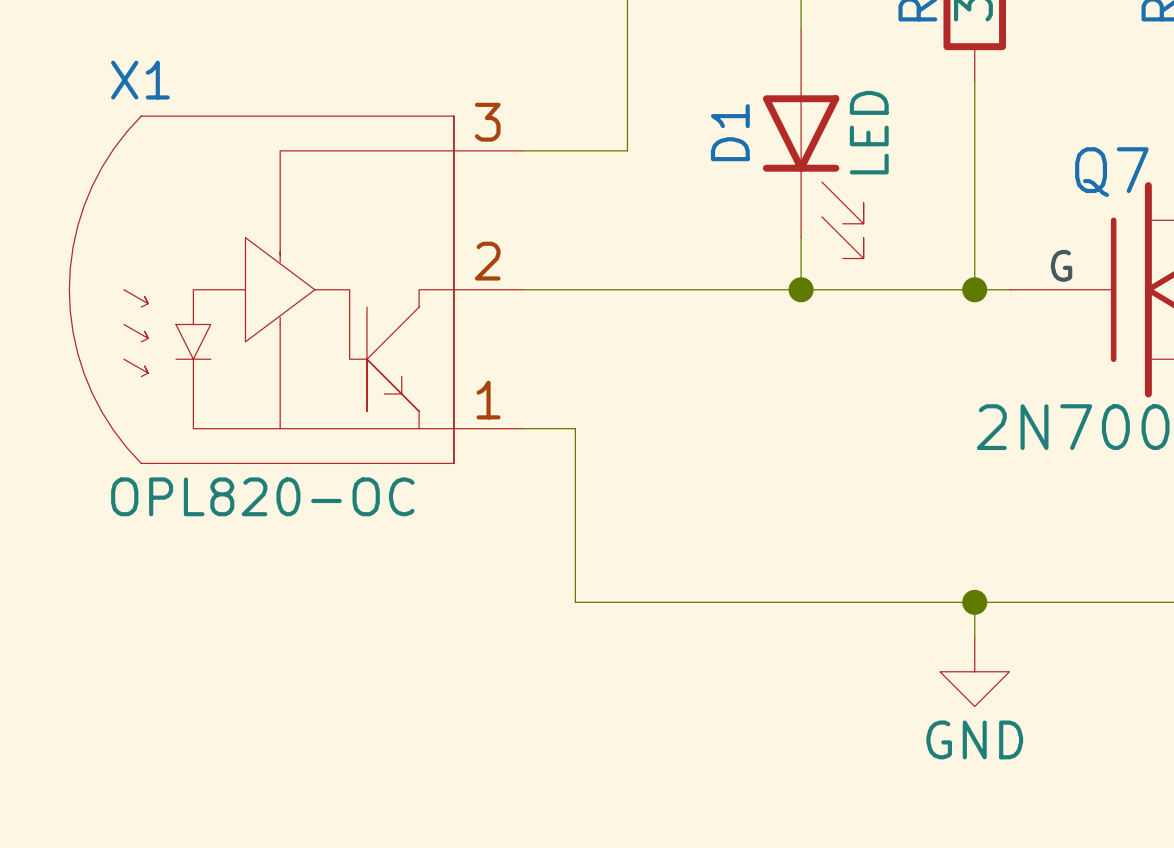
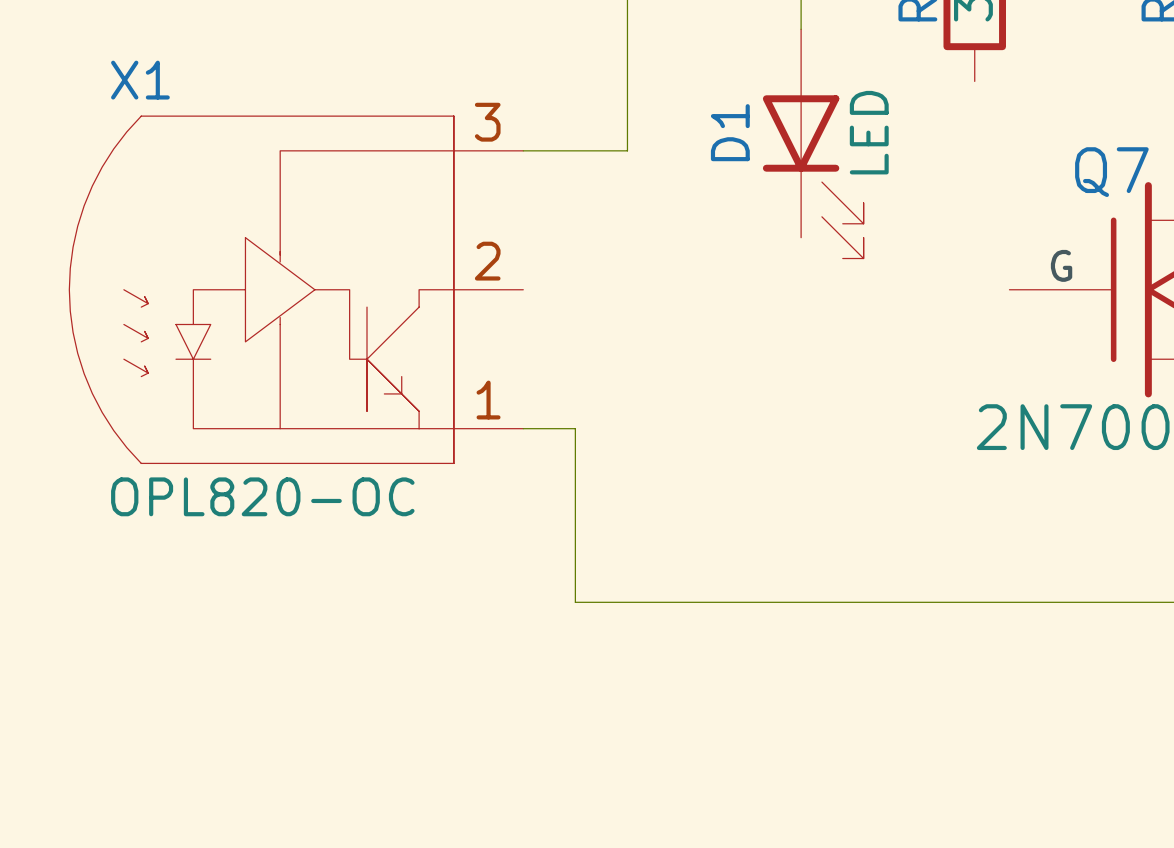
wire: (974, 81) (974, 289) -> none
wire: (801, 237) (801, 289) -> none
wire: (523, 289) (1009, 289) -> none
junction: (801, 289) -> none
junction: (974, 289) -> none
wire: (974, 602) (974, 637) -> none
junction: (974, 602) -> none
power symbol: GND (974, 671) -> none

